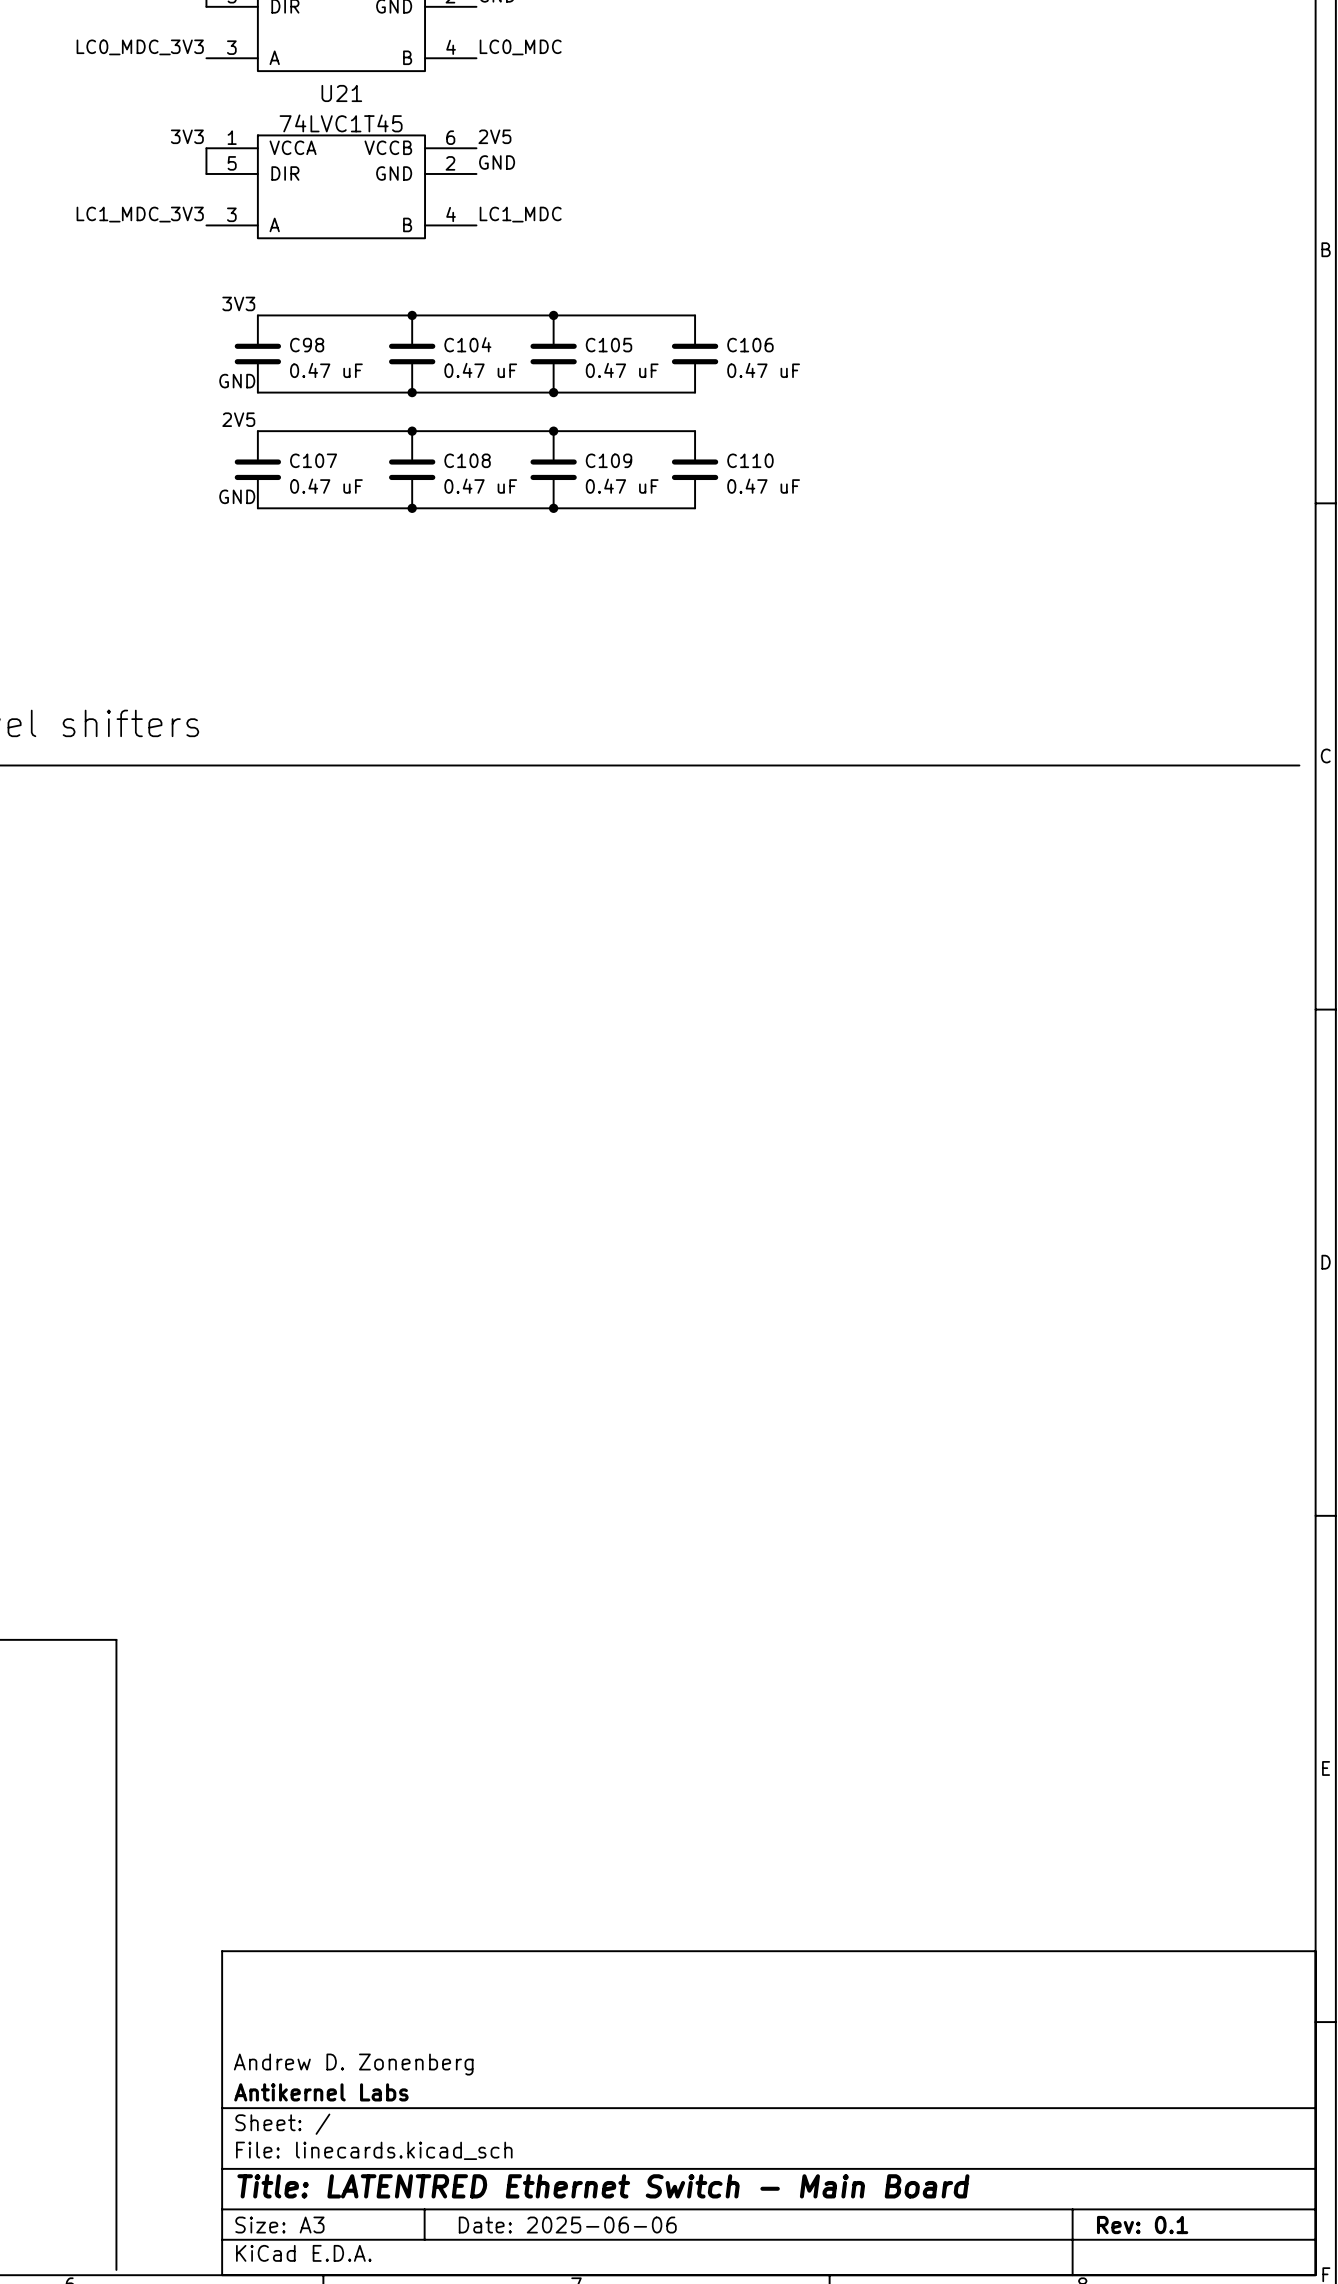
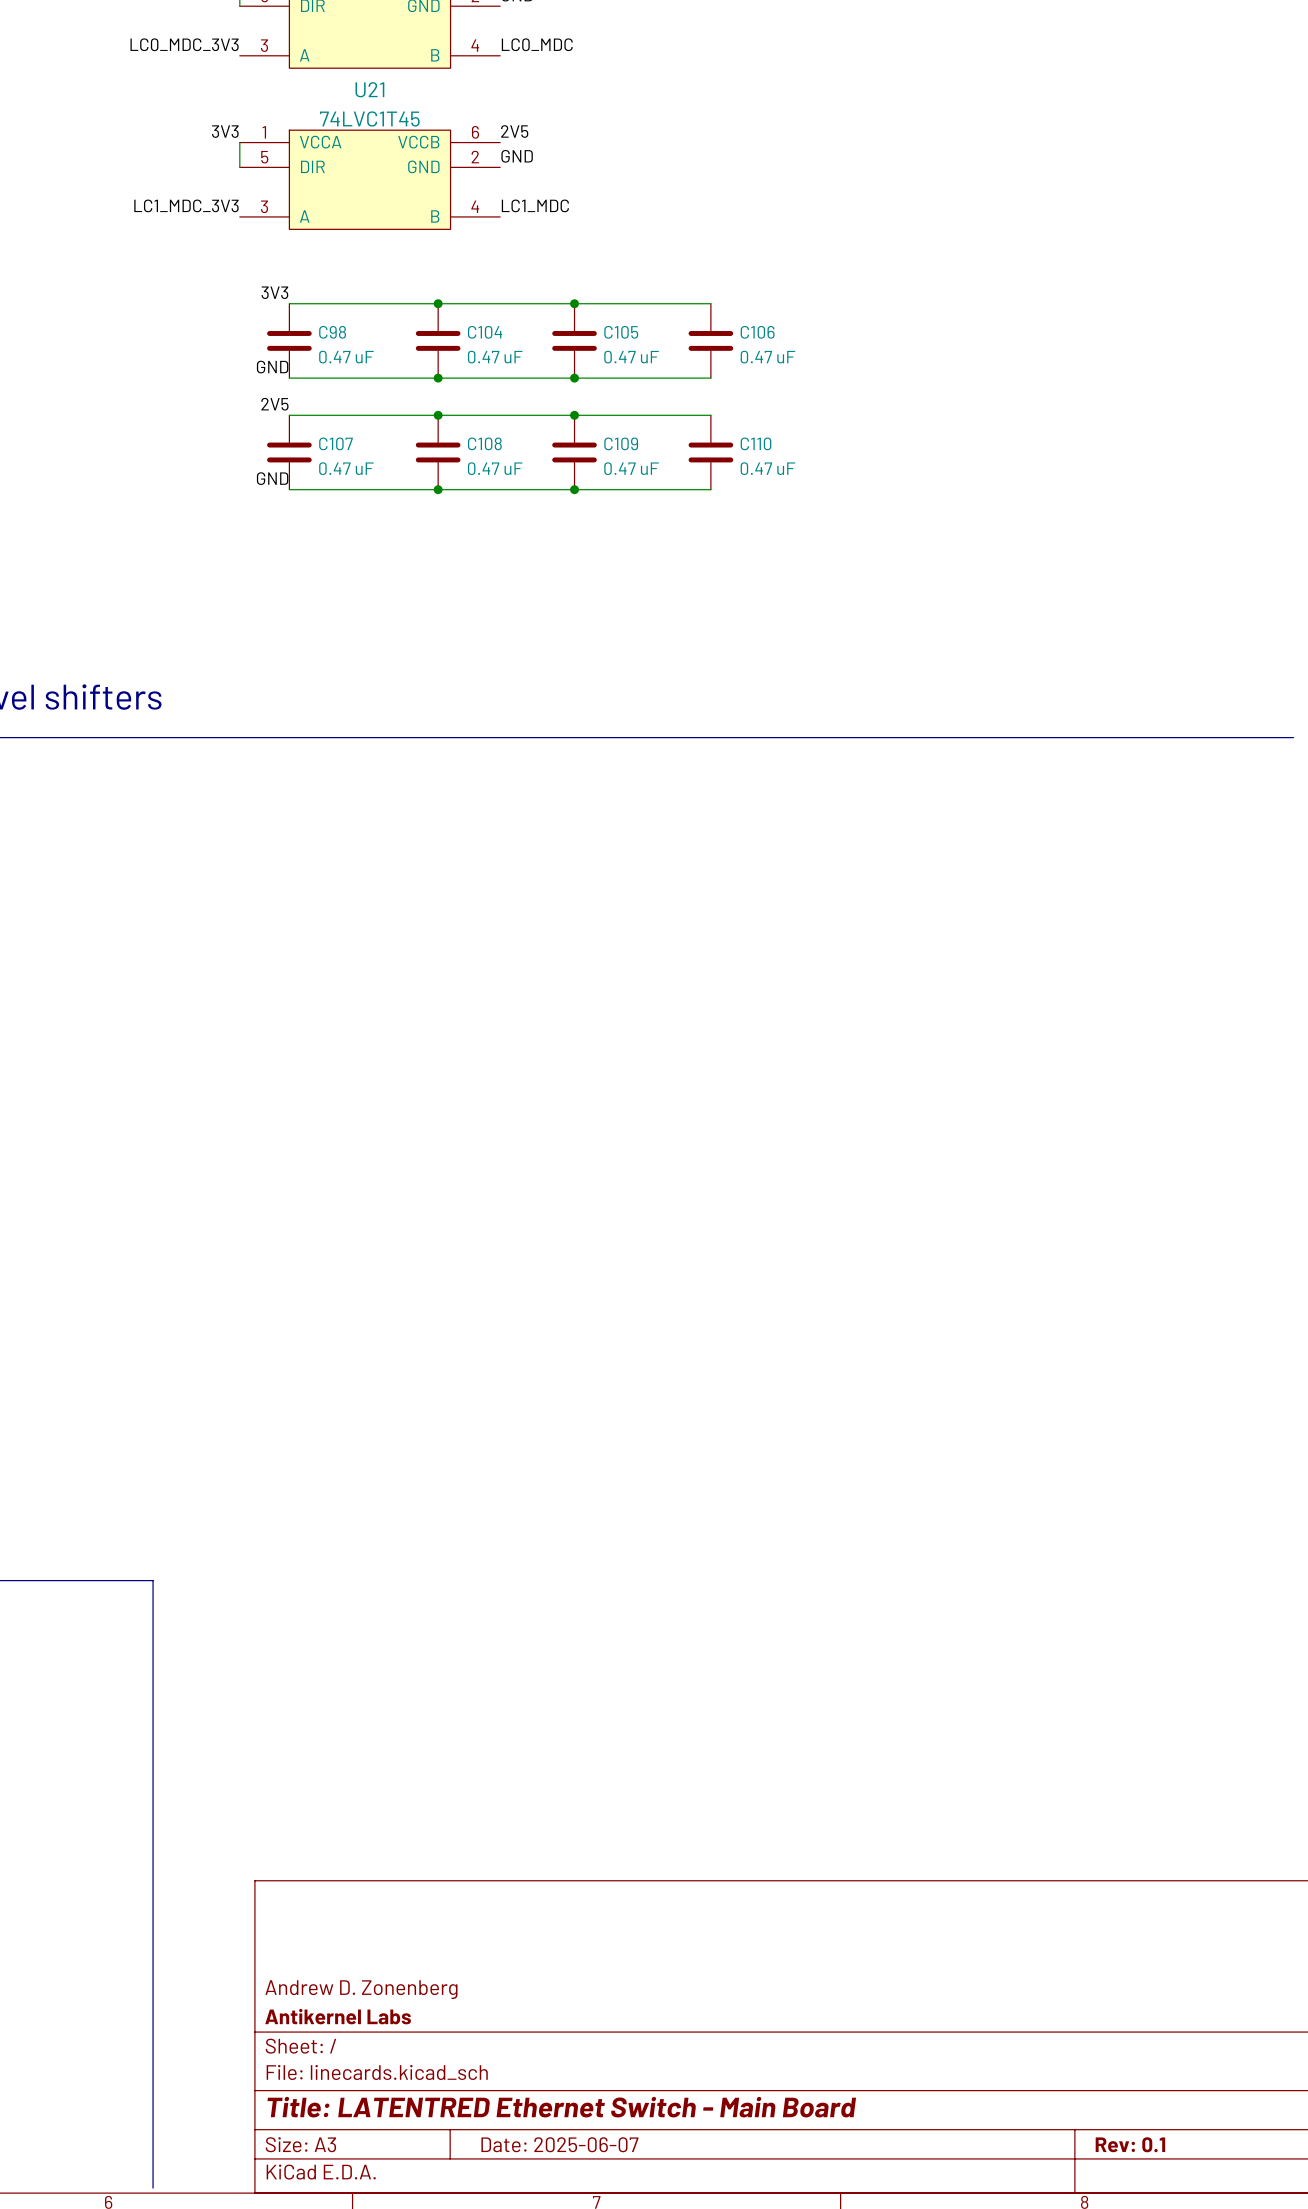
title block: Date: 2025-06-06 (567, 2225) -> Date: 2025-06-07 (559, 2144)

